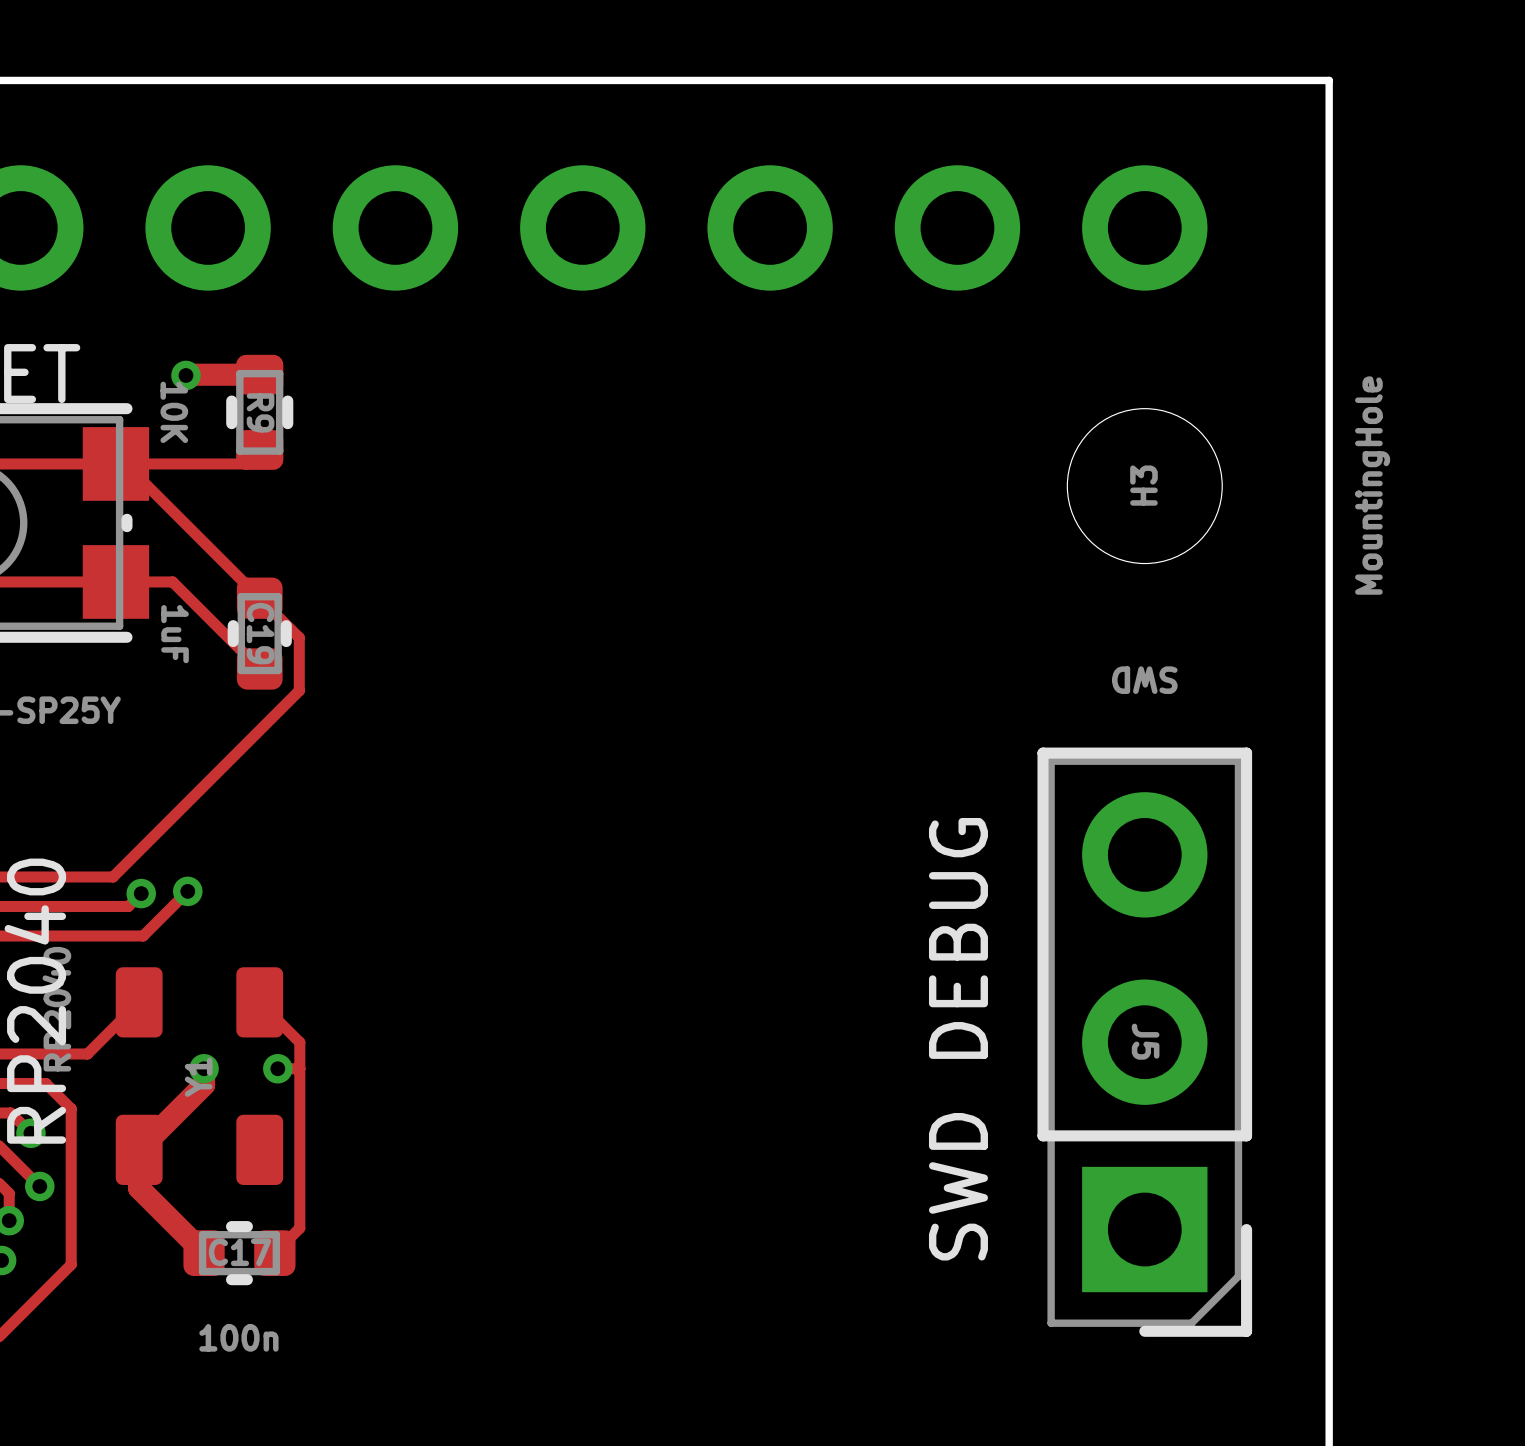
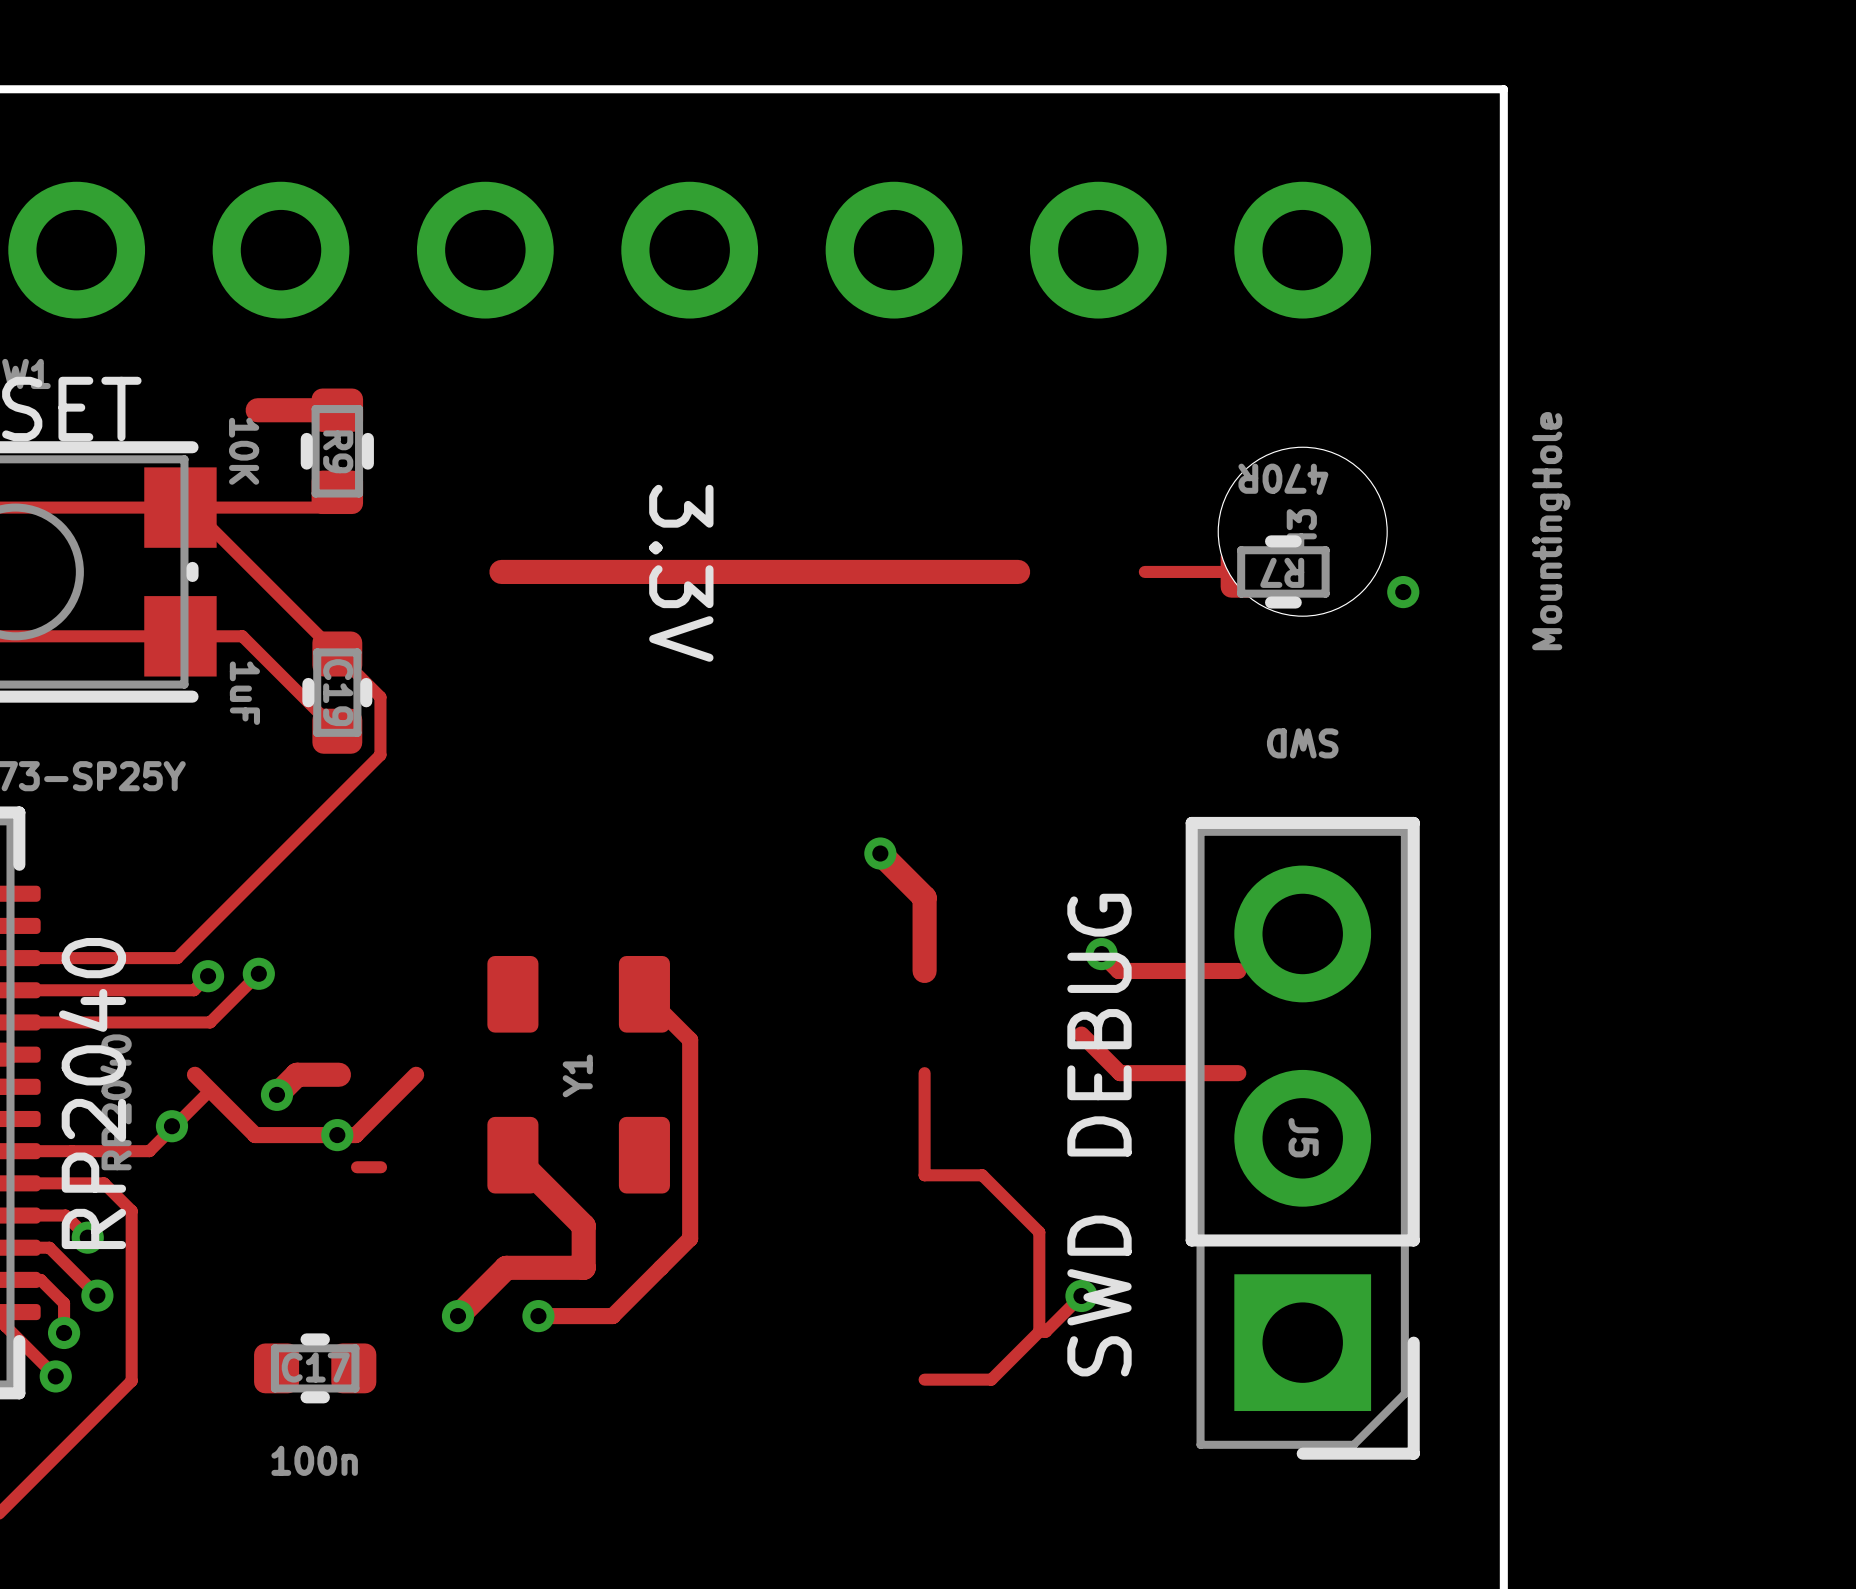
via: (185, 375) -> none
track: none -> (501, 571) (1018, 571)
track: none -> (1144, 571) (1242, 571)
R7: none -> 470R (1283, 571)
text: none -> 3.3V (681, 573)
via: none -> (1403, 592)
track: none -> (880, 853) (924, 897) (924, 970)
via: none -> (880, 853)
track: none -> (1101, 954) (1118, 970) (1238, 970)
via: none -> (1101, 954)
track: none -> (644, 994) (690, 1040) (690, 1238) (612, 1316) (538, 1316)
track: none -> (1081, 1034) (1120, 1073) (1238, 1073)
track: none -> (924, 1073) (924, 1175) (982, 1175) (1039, 1232) (1039, 1331)
track: none -> (194, 1074) (255, 1135) (355, 1135) (416, 1074)
track: none -> (338, 1074) (297, 1074) (276, 1094)
via: none -> (276, 1094)
track: (259, 1002) (299, 1042) (299, 1228) (274, 1253) -> none
via: none -> (171, 1126)
track: none -> (512, 1155) (583, 1225) (583, 1267) (506, 1267) (458, 1316)
track: (204, 1068) (204, 1084) (139, 1149) (139, 1188) (204, 1253) -> none
via: (204, 1068) -> none
via position: (277, 1068) -> (337, 1135)
Y1 position: (199, 1076) -> (578, 1074)
track: none -> (1081, 1295) (1045, 1331) (1039, 1331)
via: none -> (1081, 1295)
via: none -> (458, 1316)
via: none -> (538, 1316)
track: none -> (1039, 1331) (991, 1379) (924, 1379)

